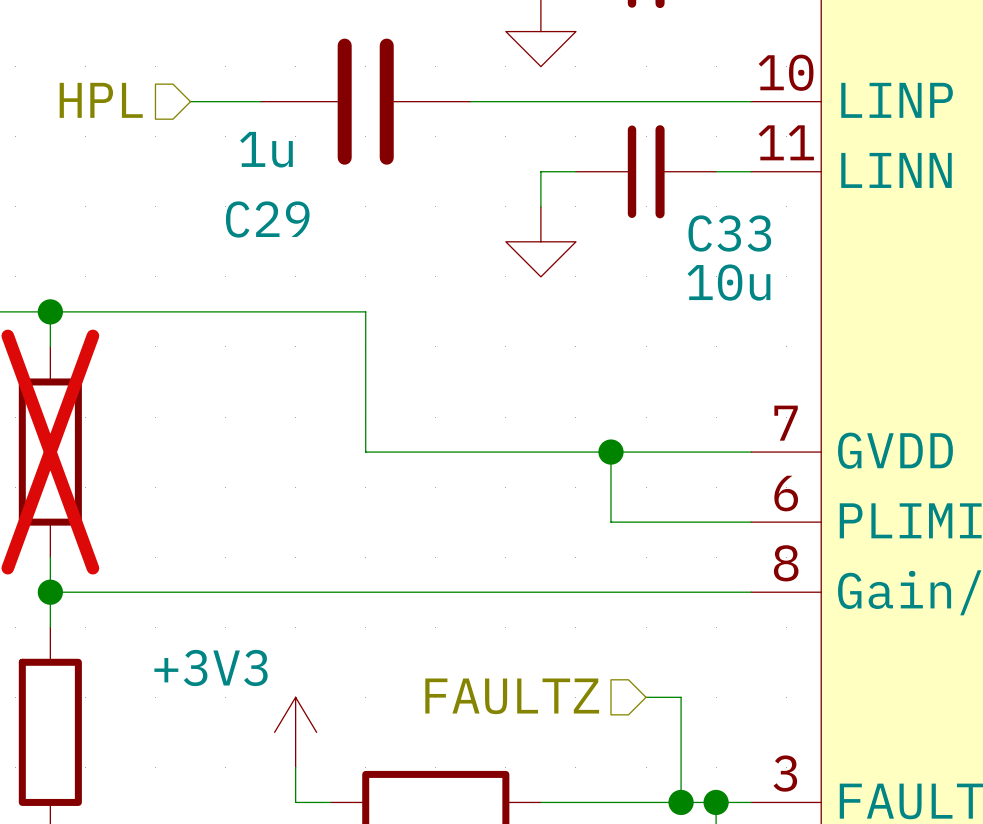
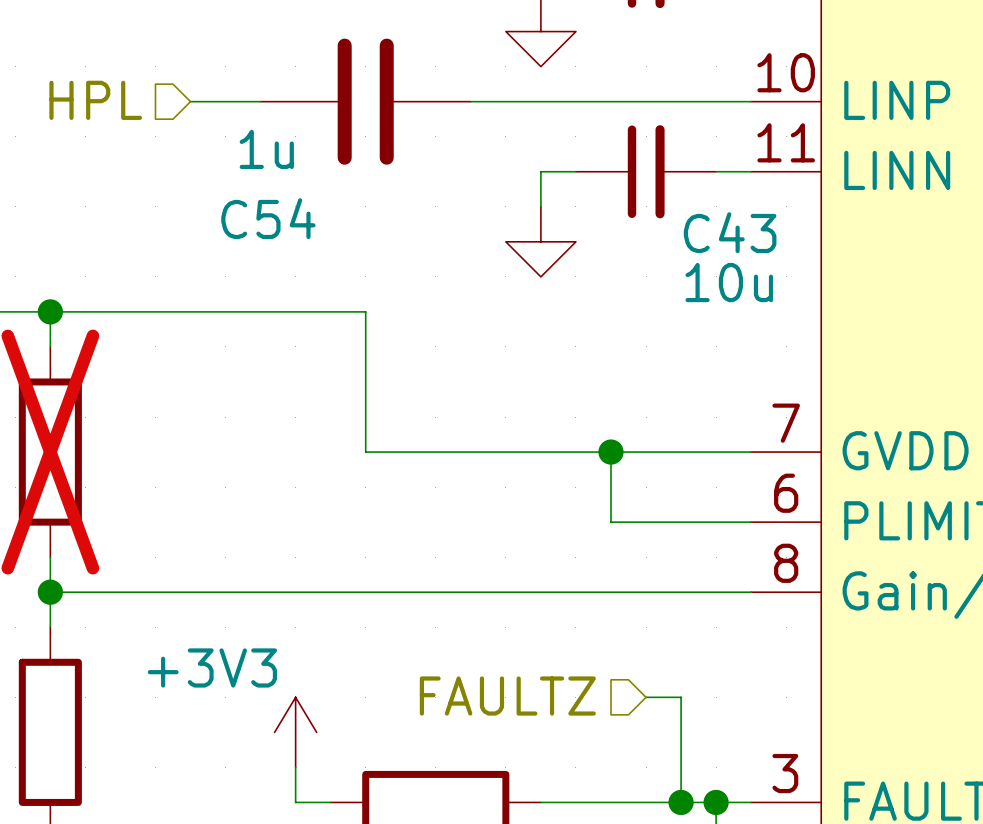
C29 name: C29 (267, 219) -> C54 (268, 218)
C33 name: C33 (729, 233) -> C43 (730, 232)

